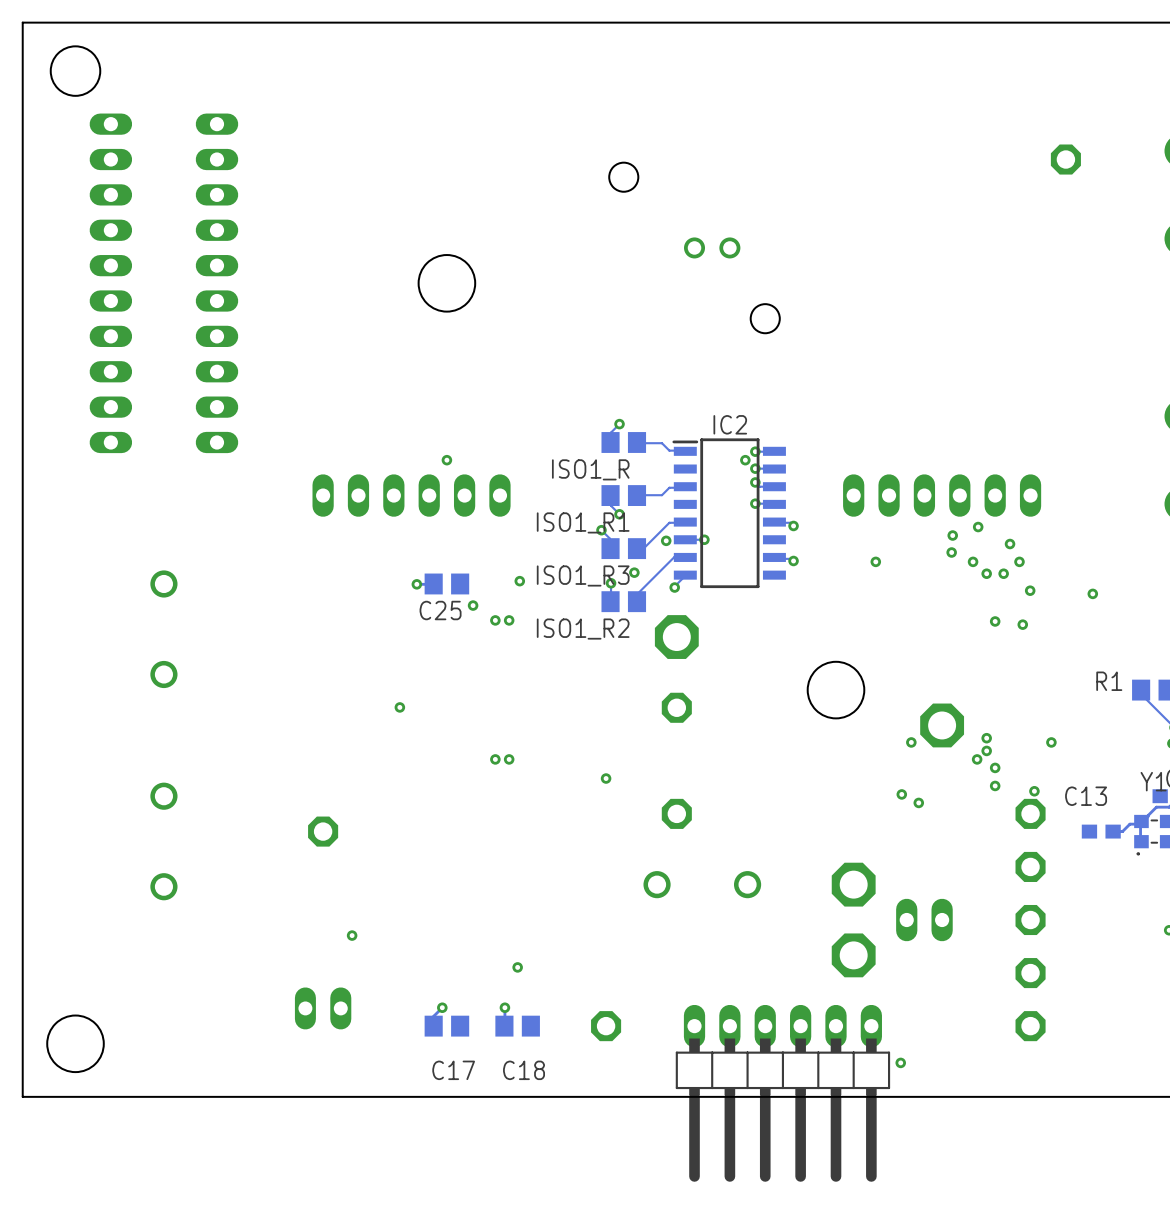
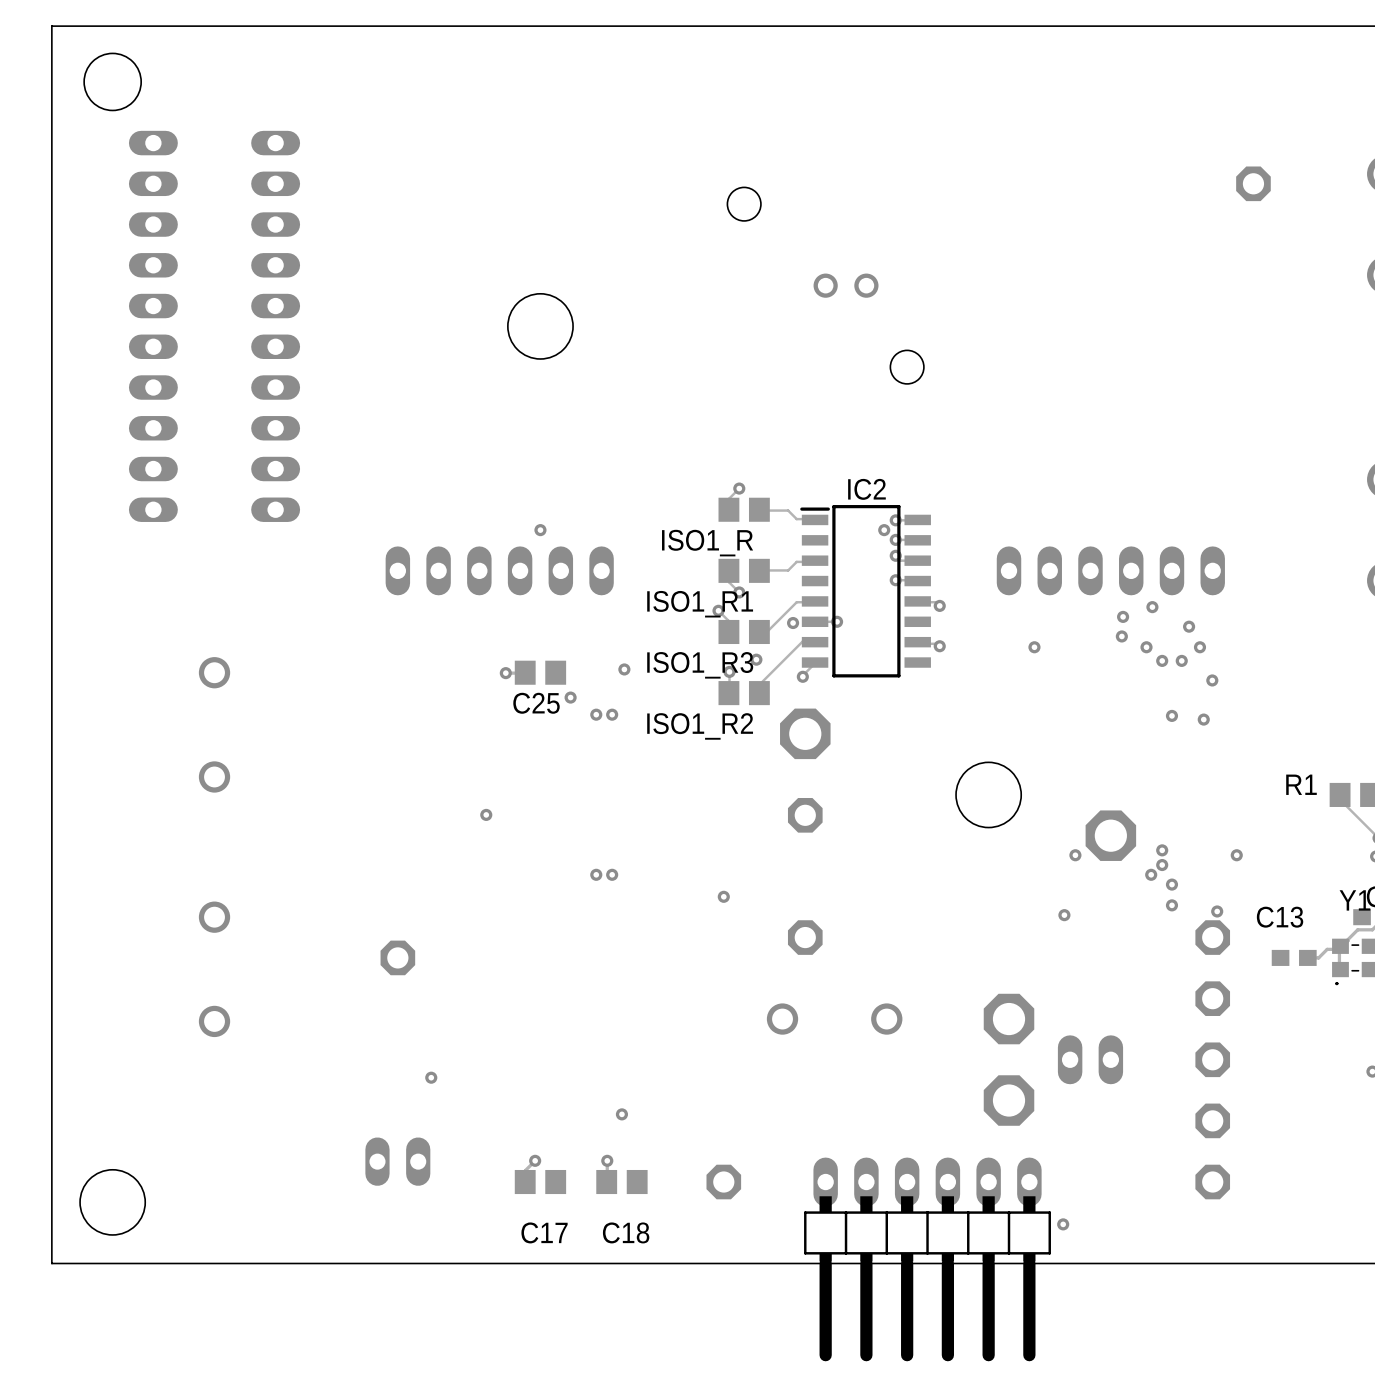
via: (1092, 593) -> none
via: (918, 802) -> none

